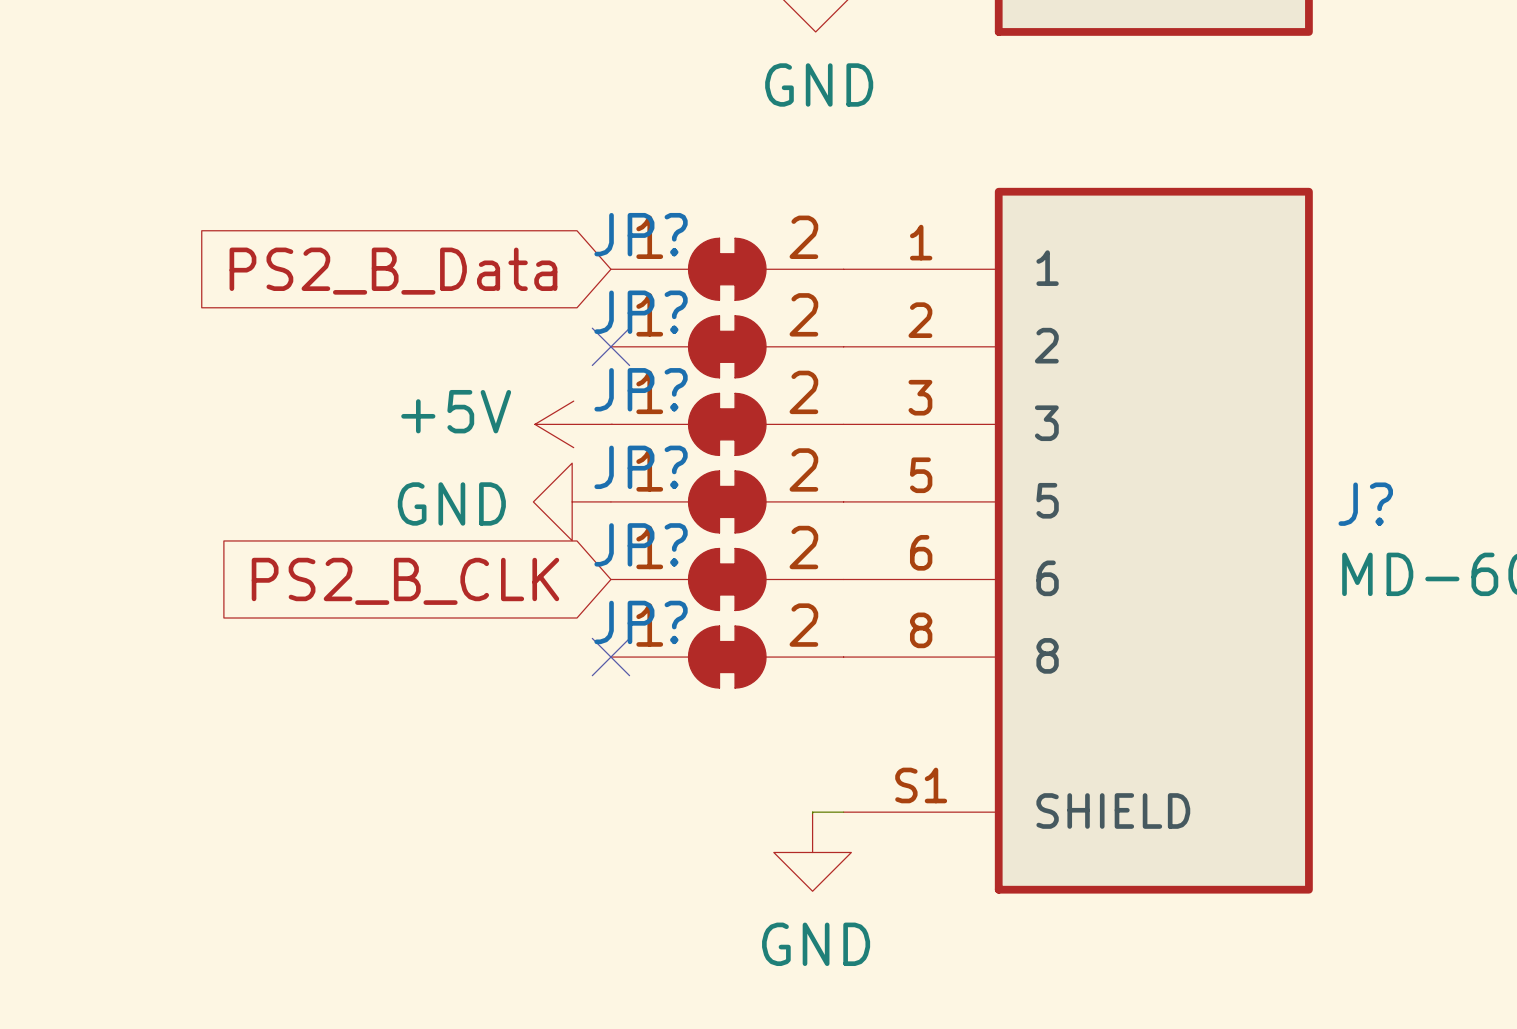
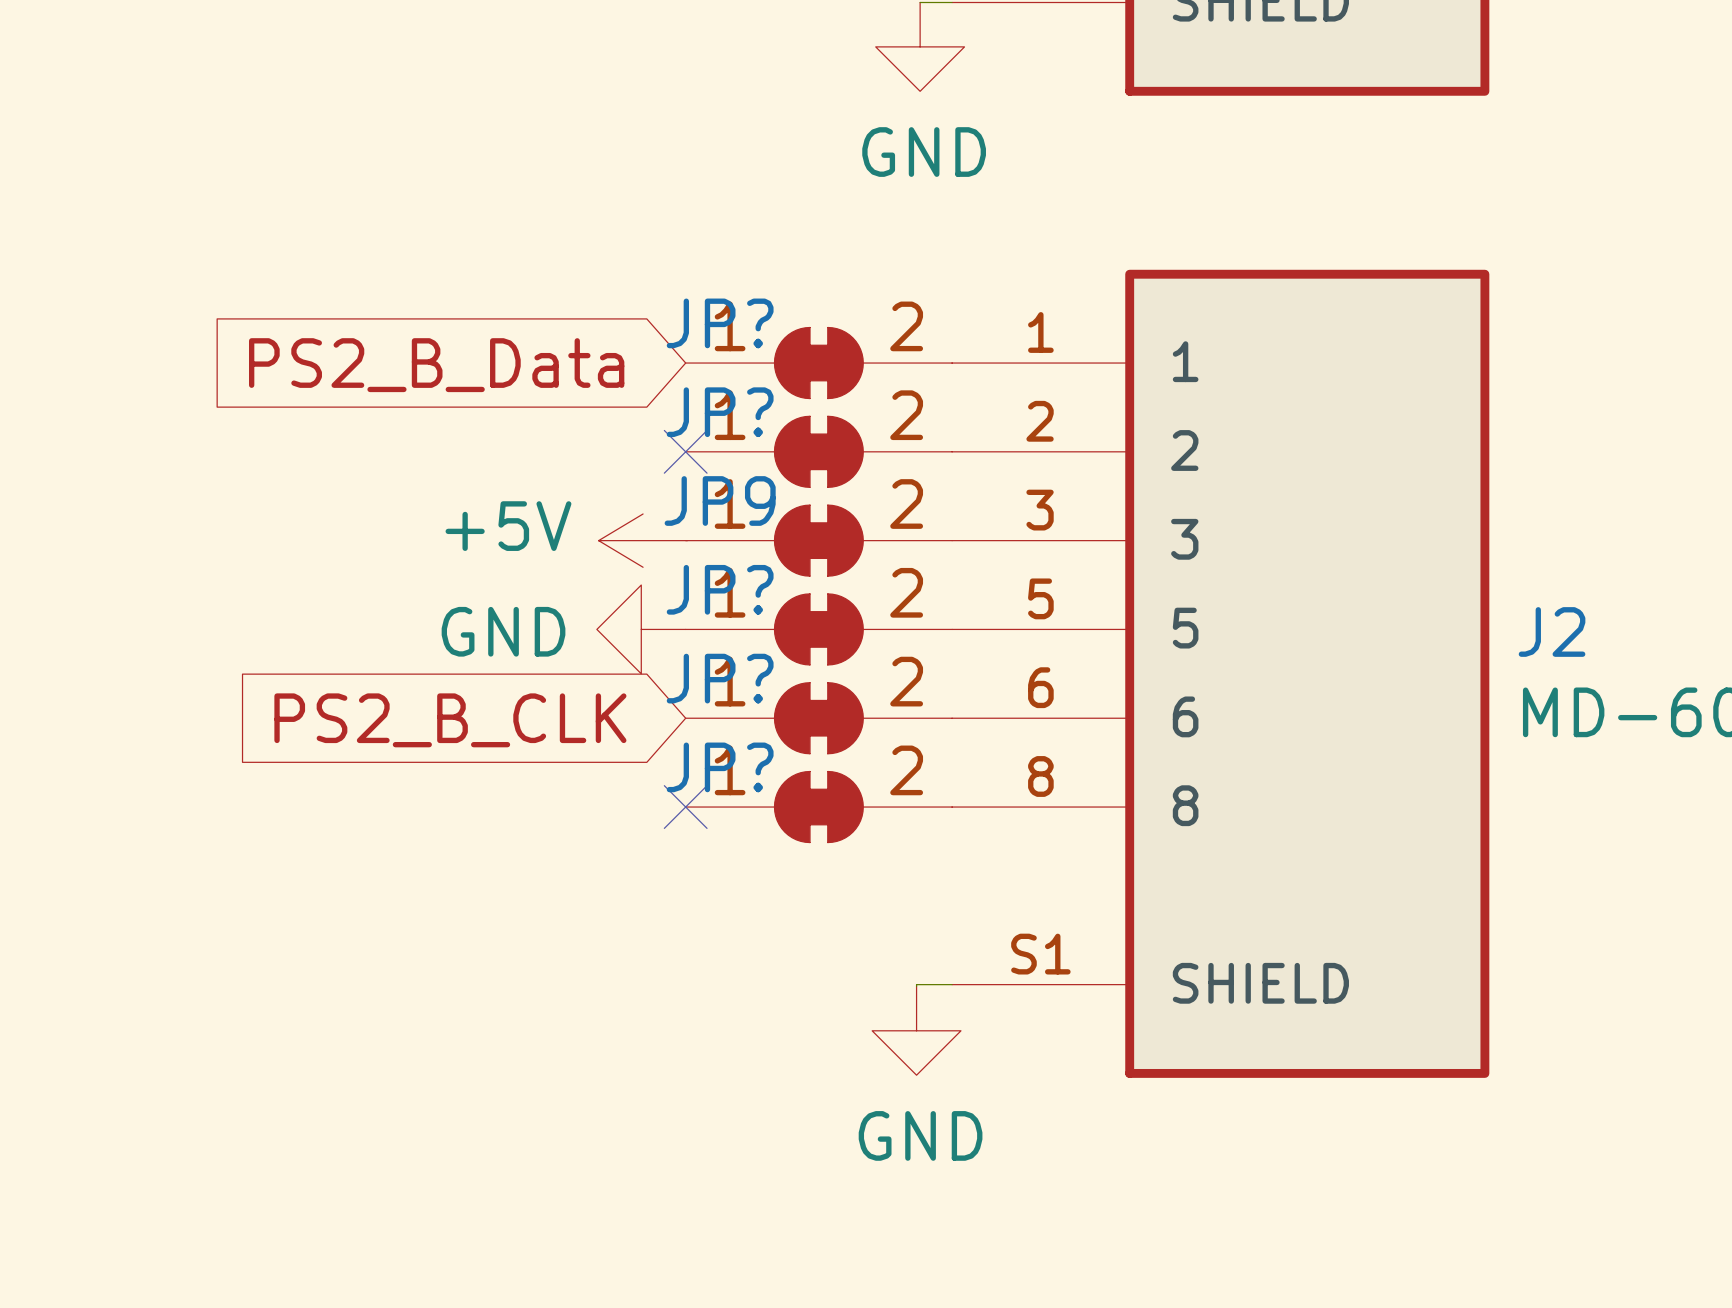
JP? name: JP? (641, 389) -> JP9 (720, 501)
J? name: J? (1365, 504) -> J2 (1552, 631)

